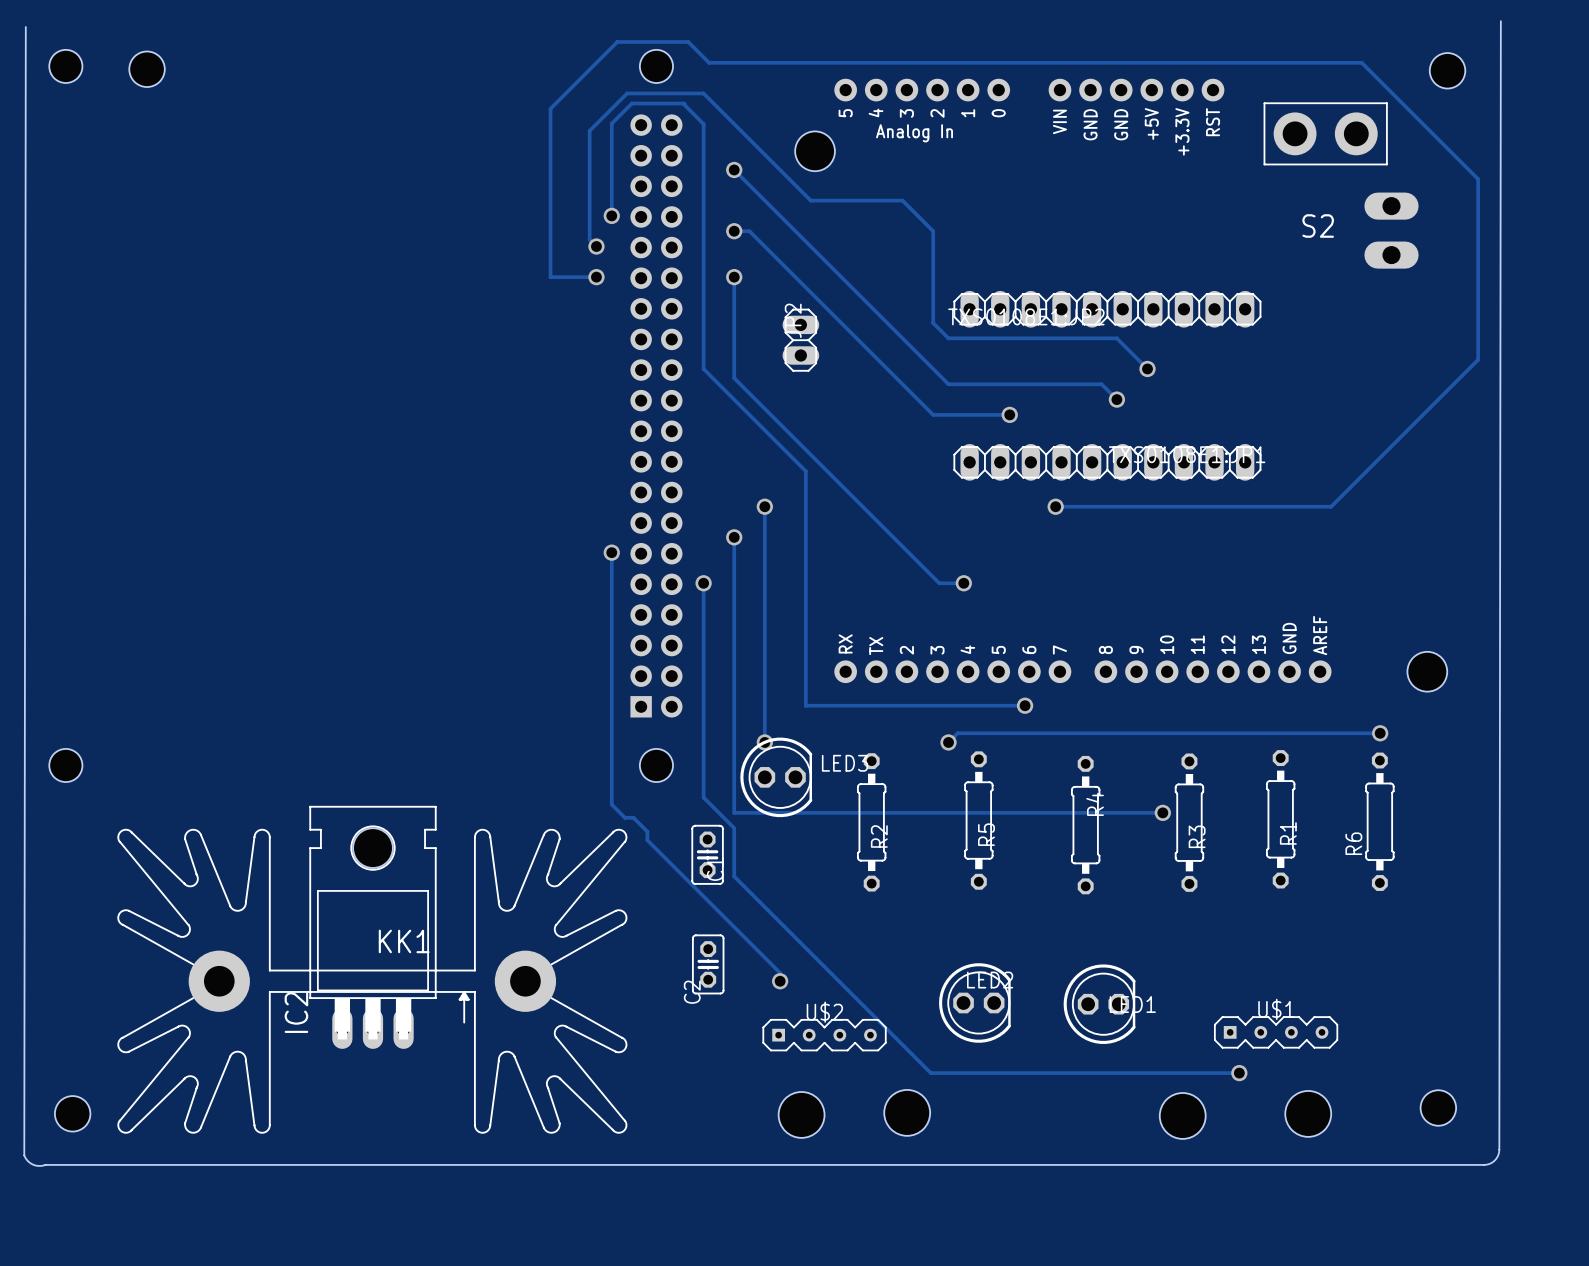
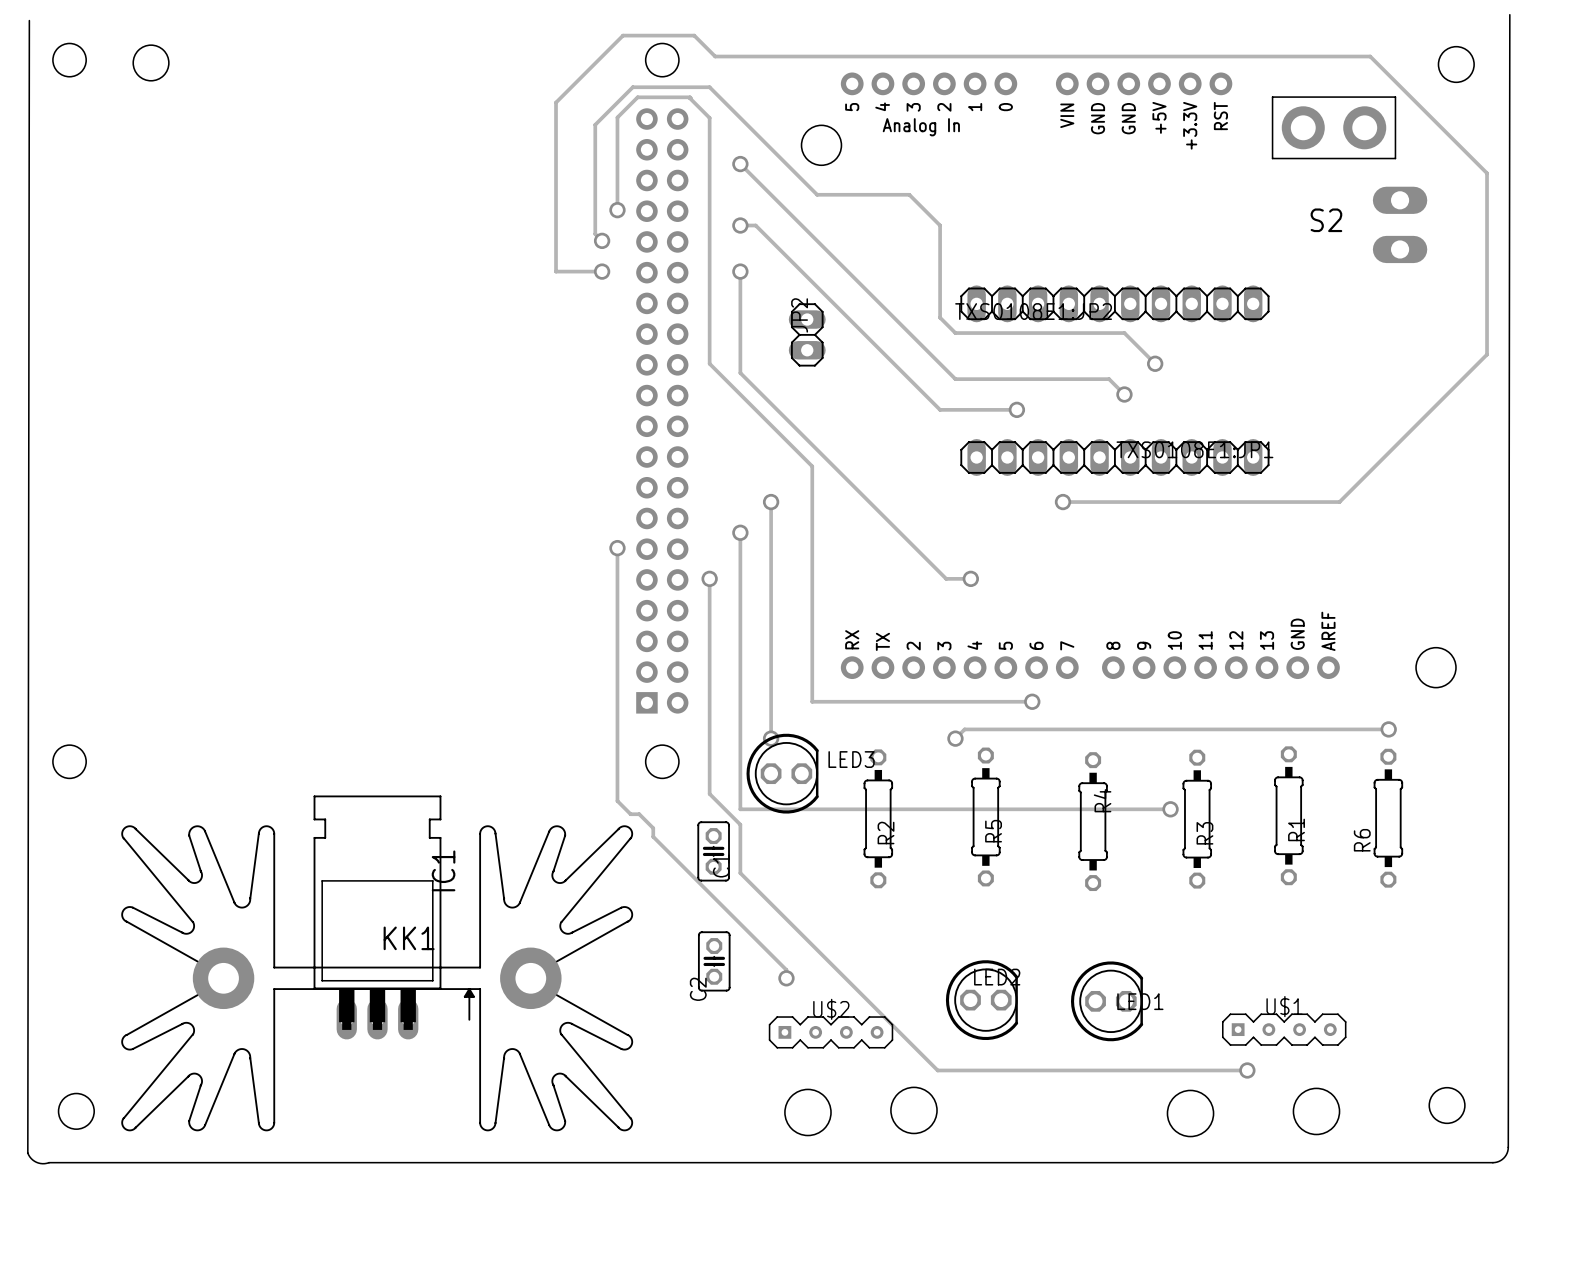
IC1: none -> (377, 917)
IC2: (372, 927) -> none

